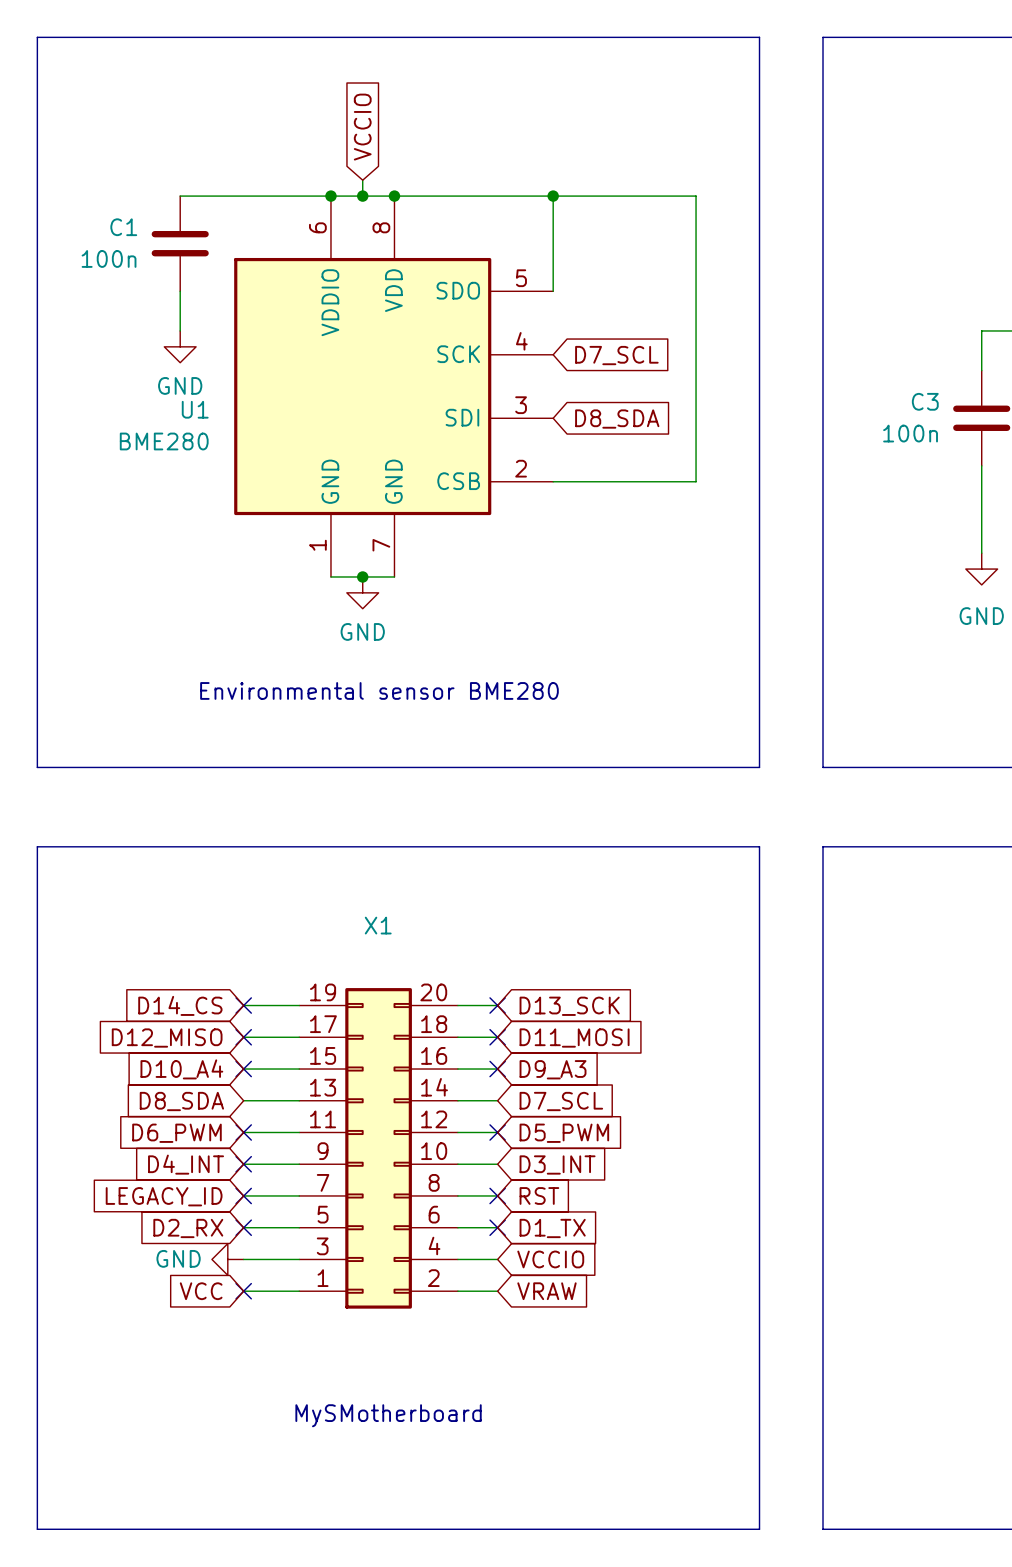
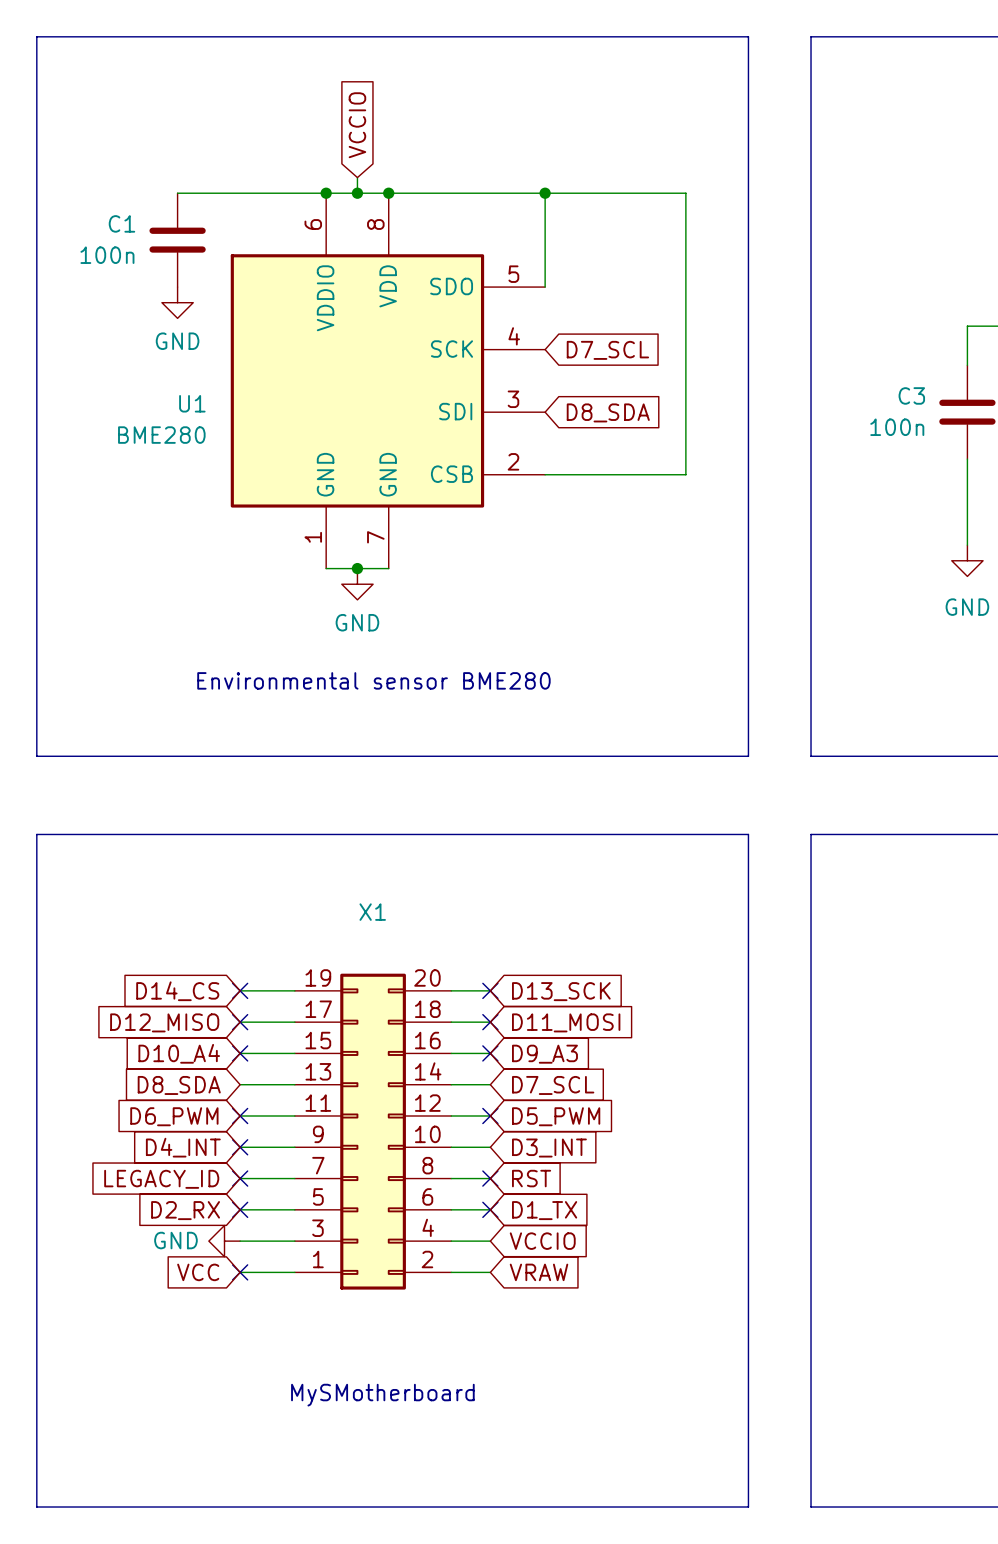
wire: (180, 291) (180, 330) -> none
power symbol position: GND (180, 346) -> GND (177, 302)

